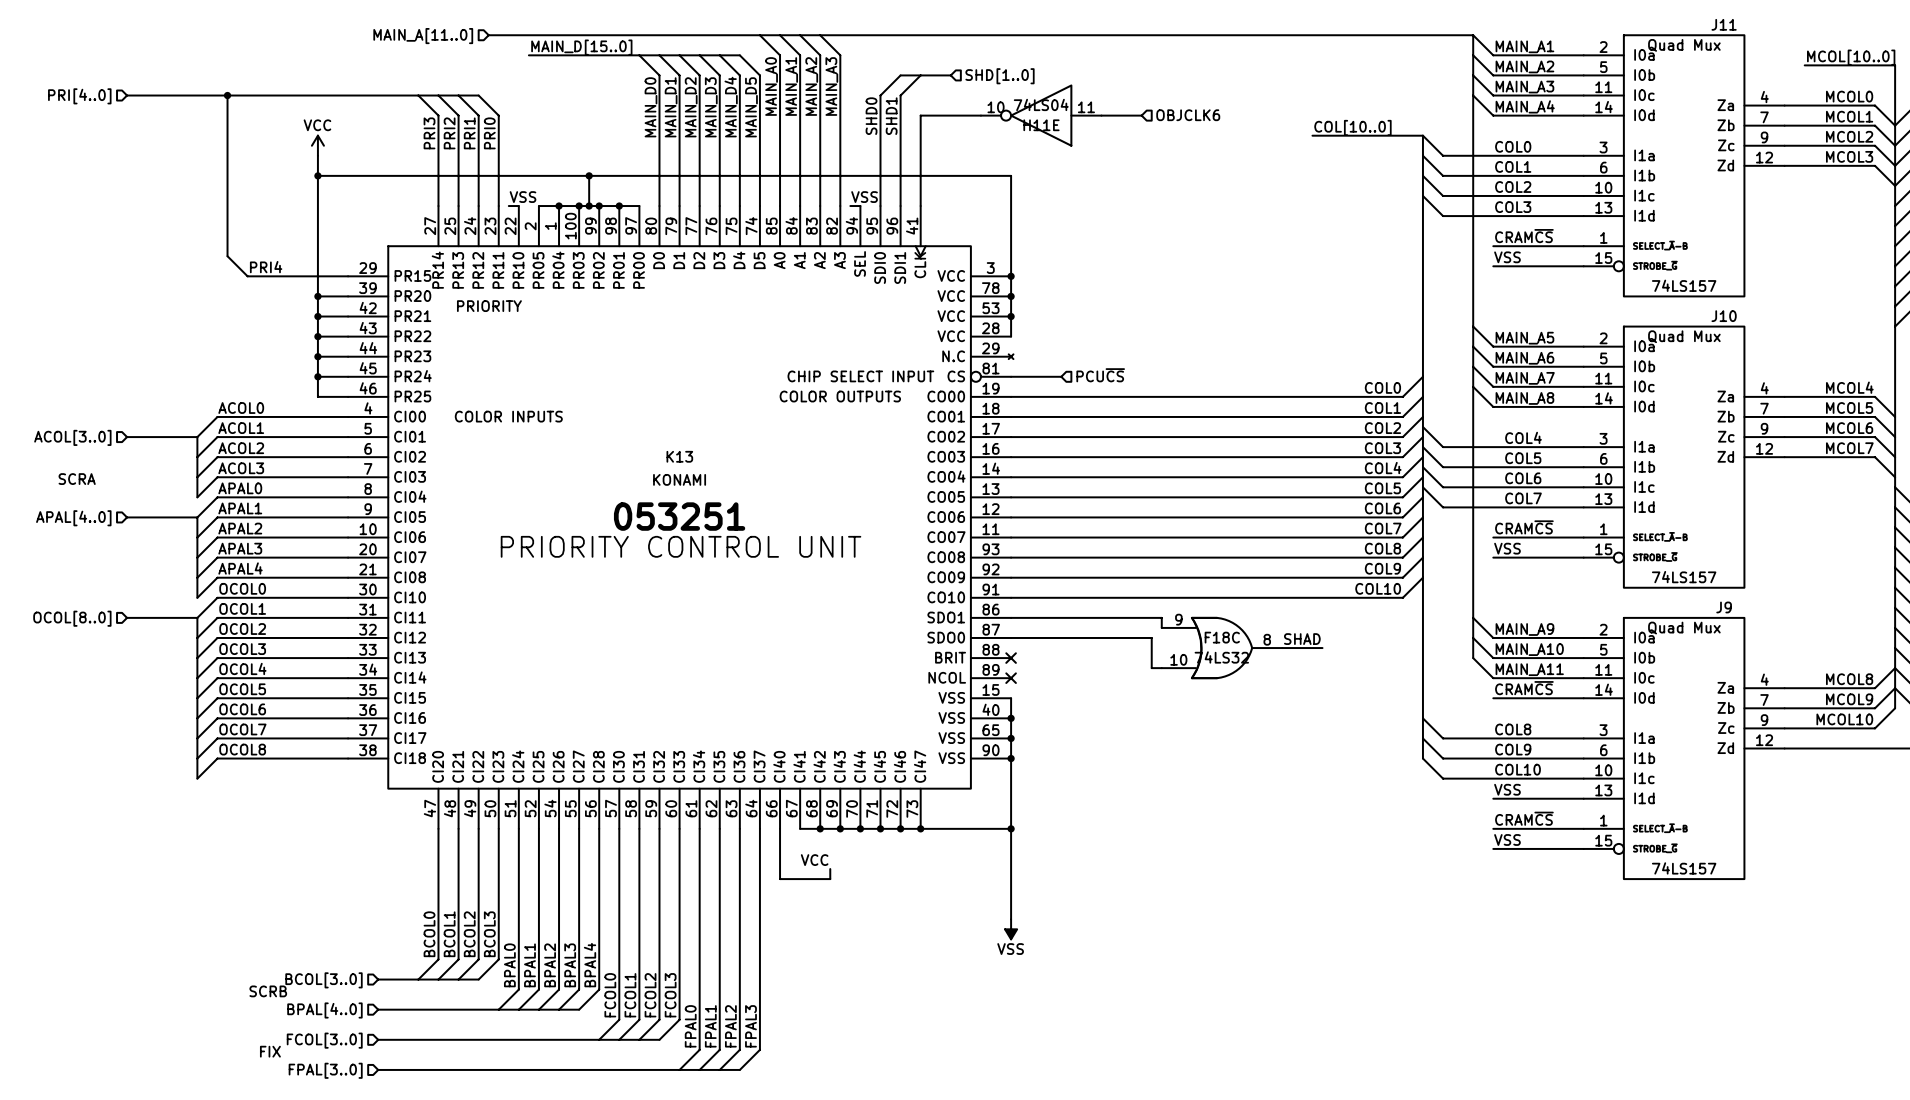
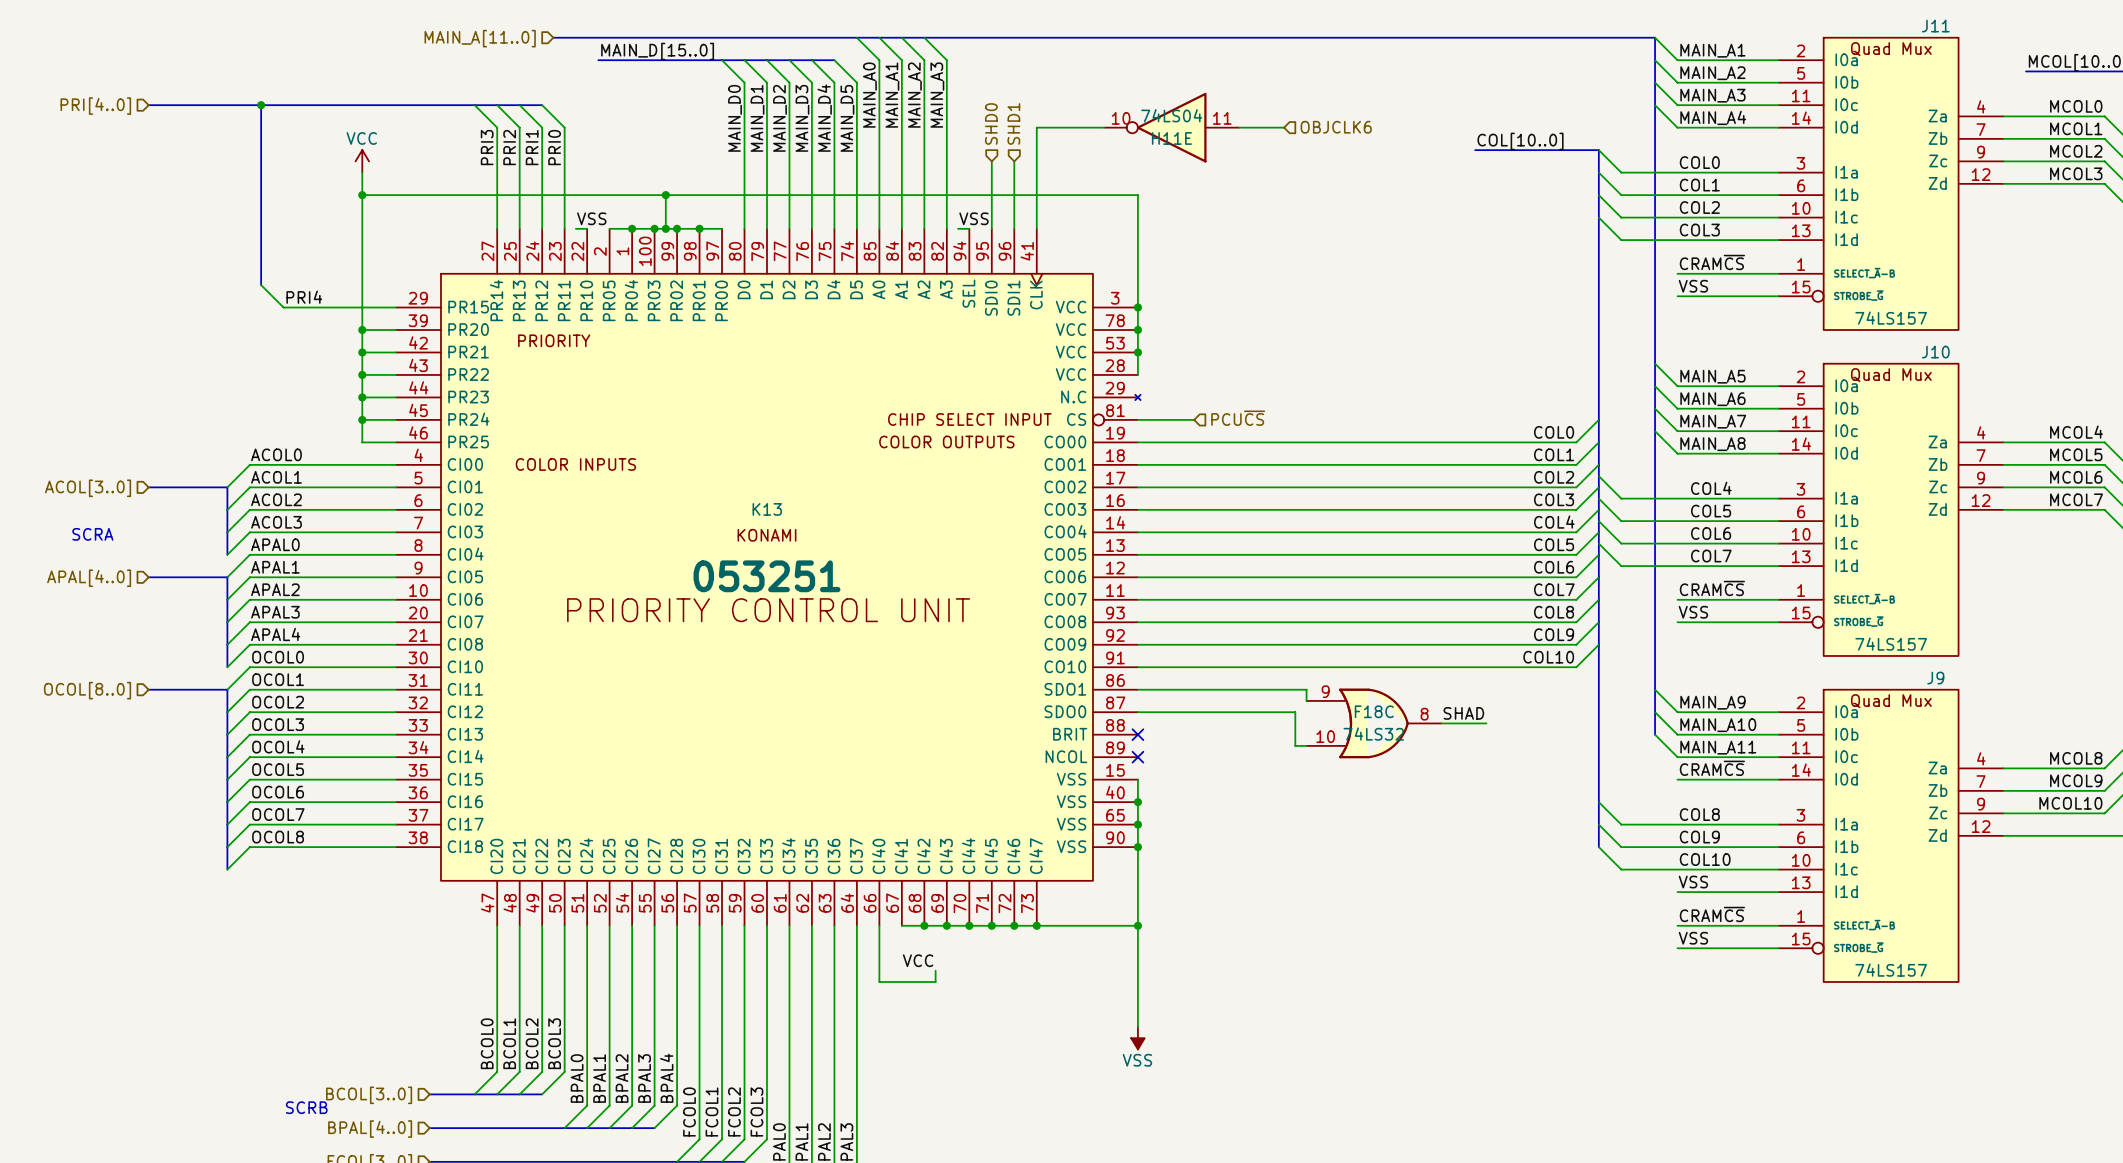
wire: (900, 75) (880, 95) (880, 145) -> none
bus: (900, 75) (950, 75) -> none
wire: (920, 75) (900, 95) (900, 145) -> none
hierarchical label: SHD[1..0] (1000, 76) -> none
hierarchical label: none -> SHD0 (991, 124)
hierarchical label: none -> SHD1 (1013, 124)
label: SHD0 (871, 116) -> none
label: SHD1 (891, 116) -> none

